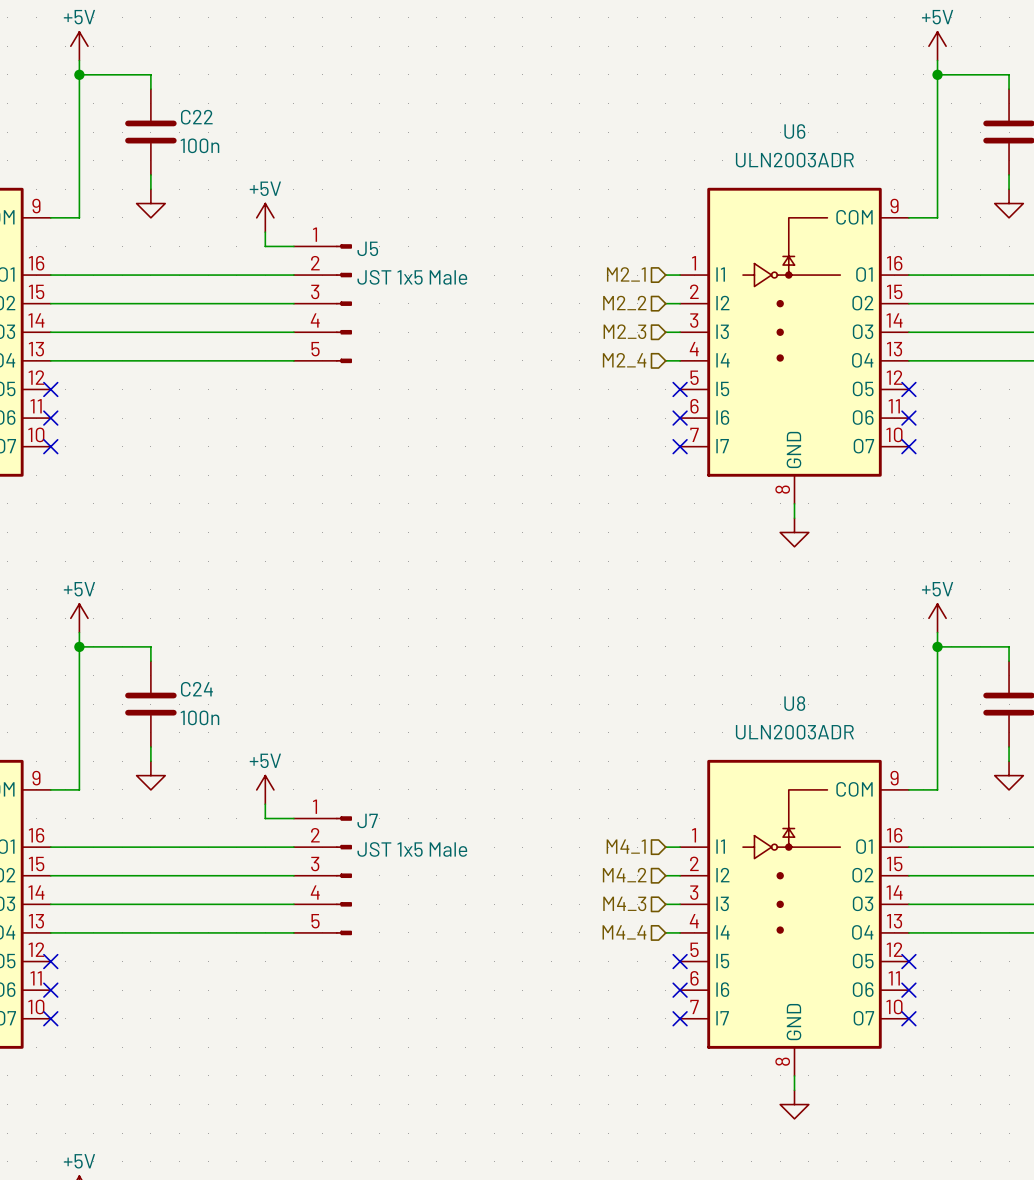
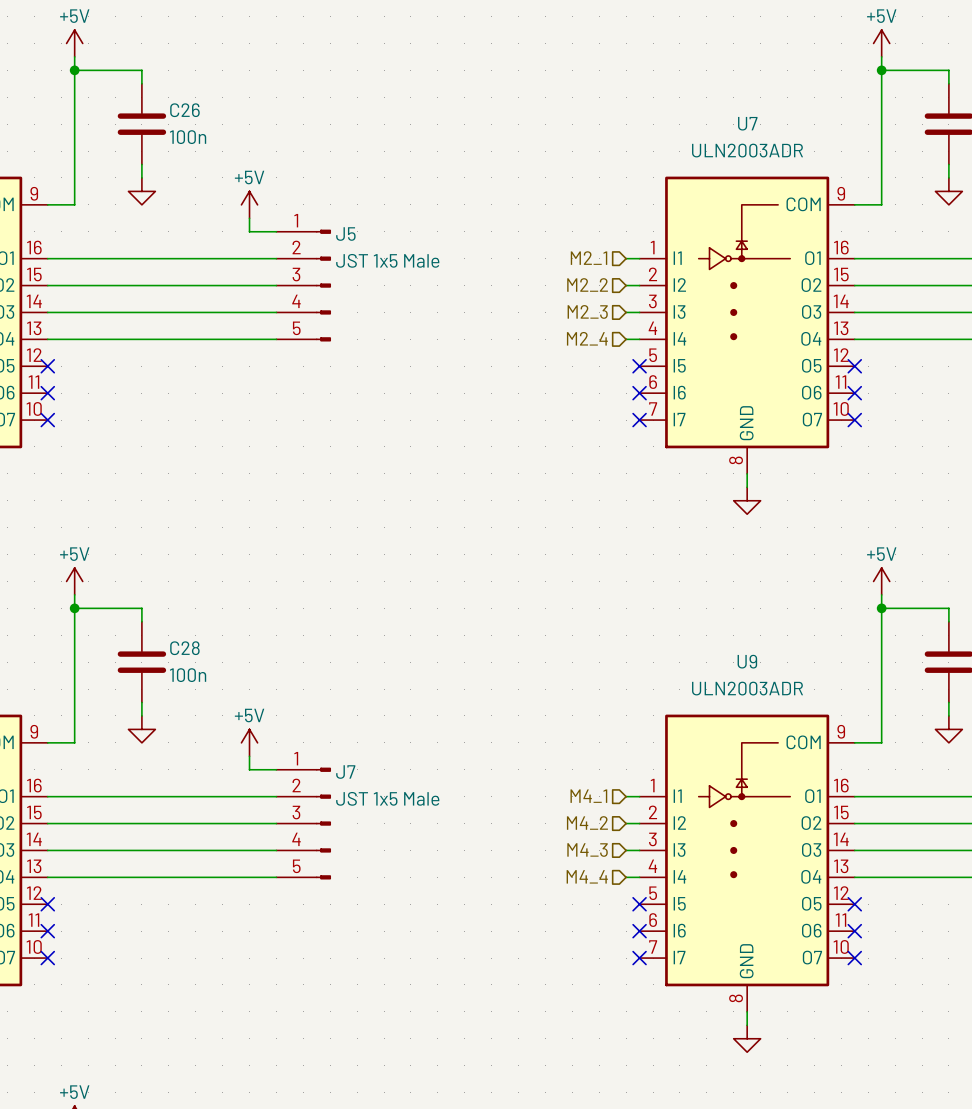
C22 name: C22 (196, 117) -> C26 (184, 110)
U6 name: U6 (794, 131) -> U7 (747, 123)
C24 name: C24 (196, 689) -> C28 (184, 648)
U8 name: U8 (794, 703) -> U9 (747, 661)

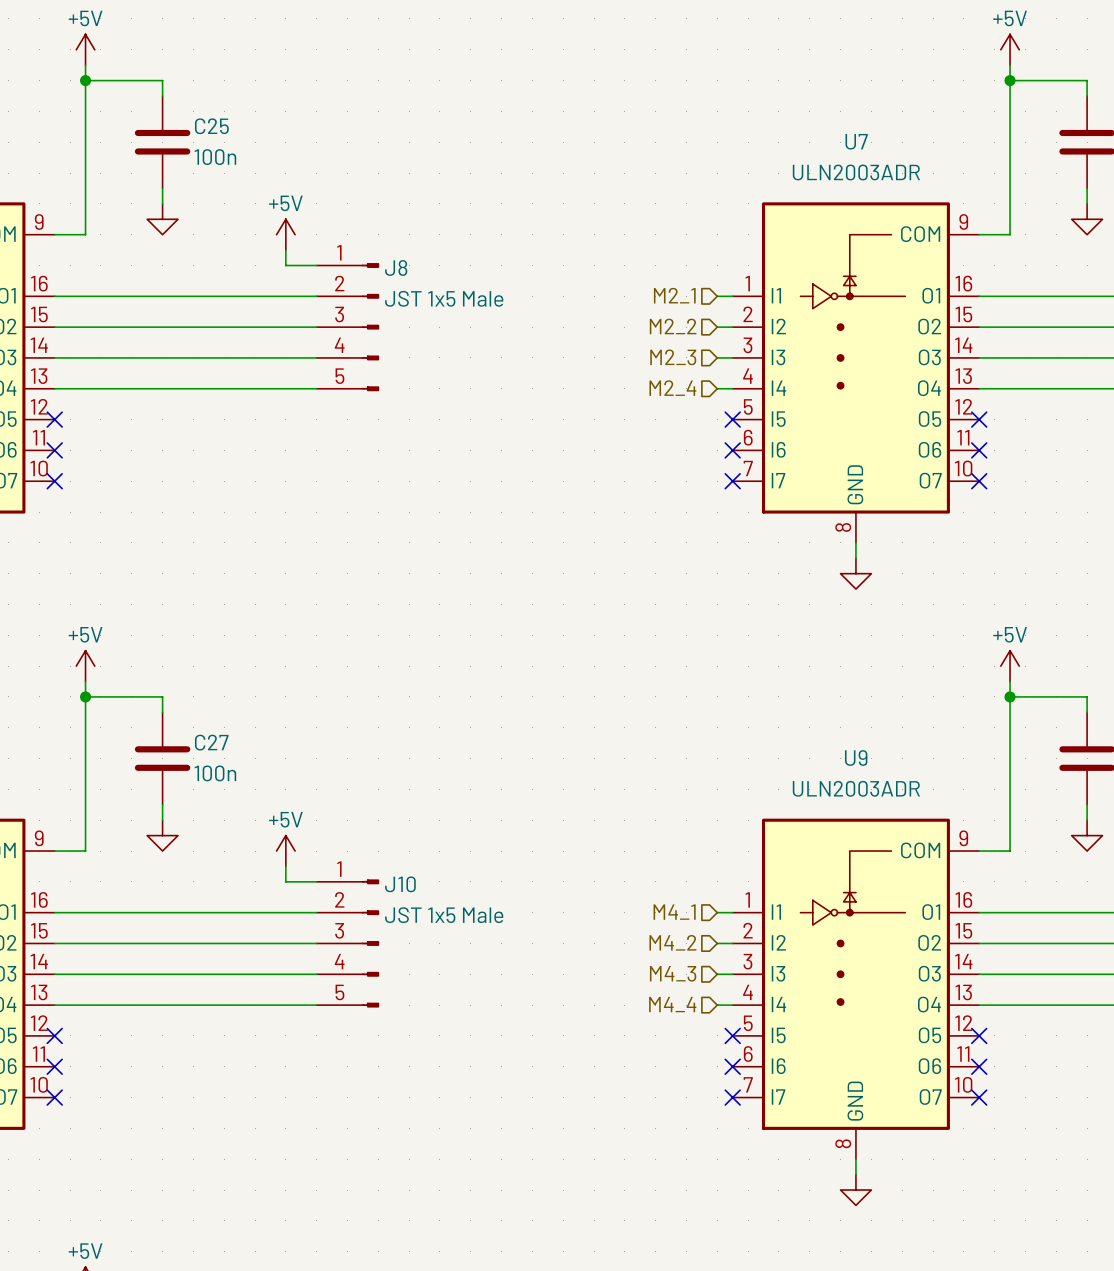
C26 name: C26 (184, 110) -> C25 (211, 126)
J5 name: J5 (345, 234) -> J8 (396, 267)
C28 name: C28 (184, 648) -> C27 (211, 742)
J7 name: J7 (345, 772) -> J10 (400, 884)

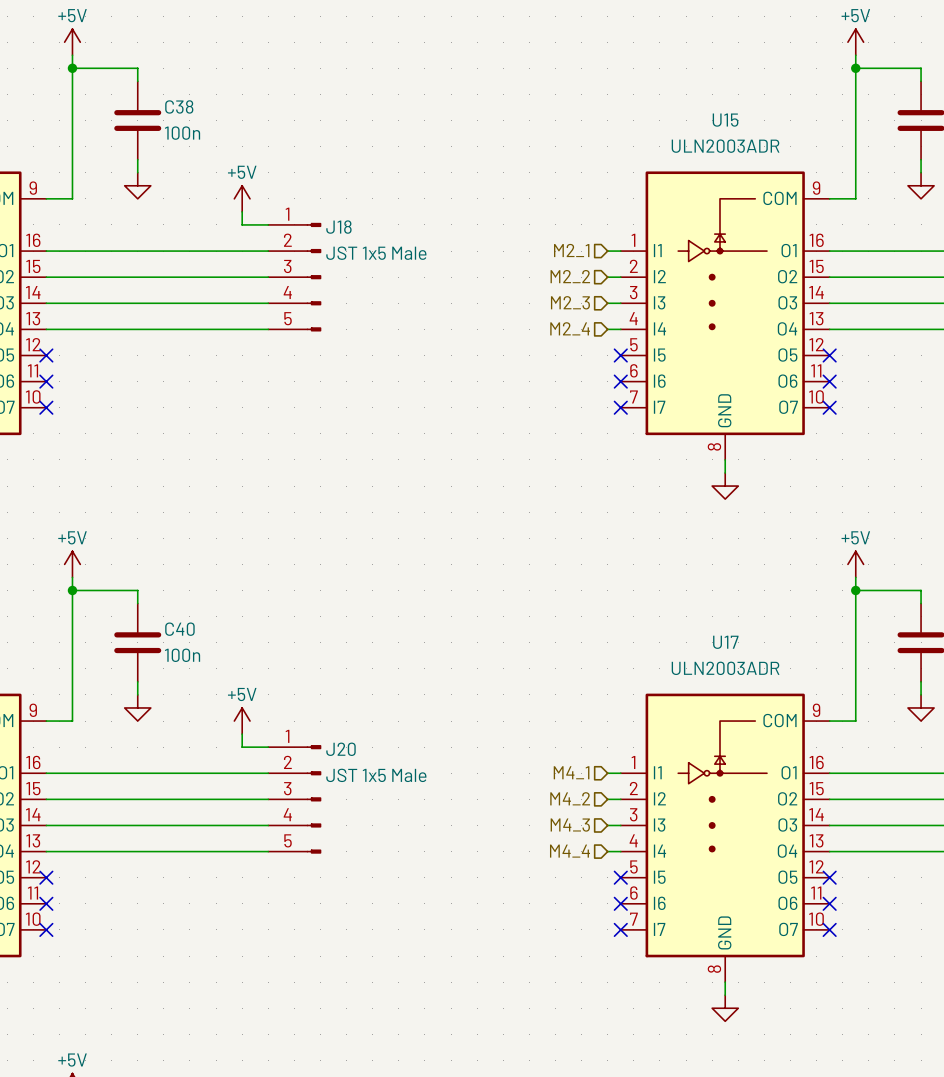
C25 name: C25 (211, 126) -> C38 (179, 106)
U7 name: U7 (856, 141) -> U15 (725, 120)
J8 name: J8 (396, 267) -> J18 (338, 227)
C27 name: C27 (211, 742) -> C40 (179, 629)
U9 name: U9 (856, 758) -> U17 (725, 642)
J10 name: J10 (400, 884) -> J20 (340, 749)

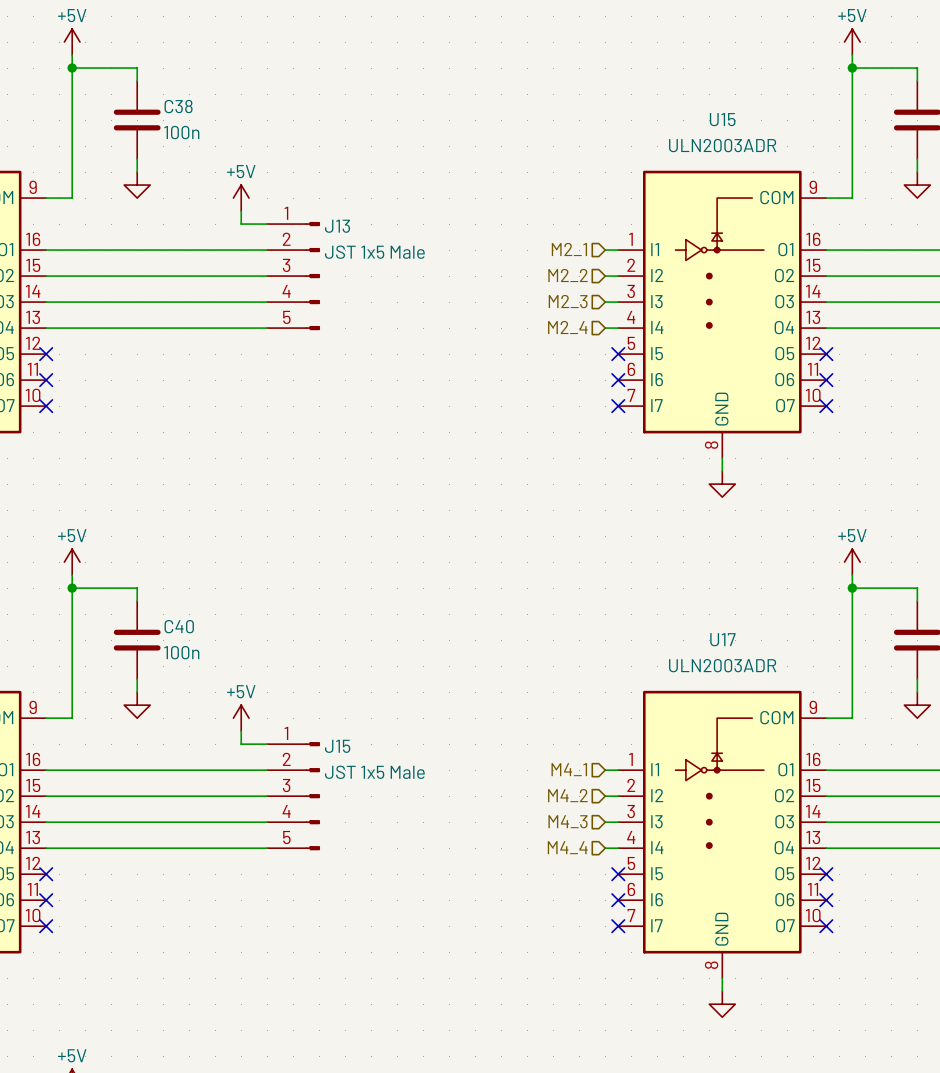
J18 name: J18 (338, 227) -> J13 (337, 226)
J20 name: J20 (340, 749) -> J15 (337, 746)

